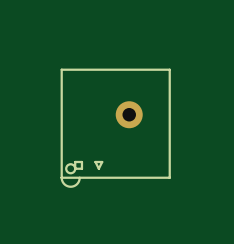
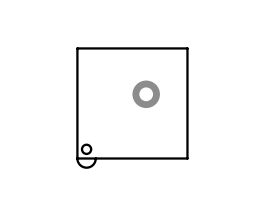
board edge: (81, 162) (75, 162) (75, 168) (81, 168) (81, 162) -> none
board edge: (102, 162) (95, 162) (98, 168) (102, 162) -> none

